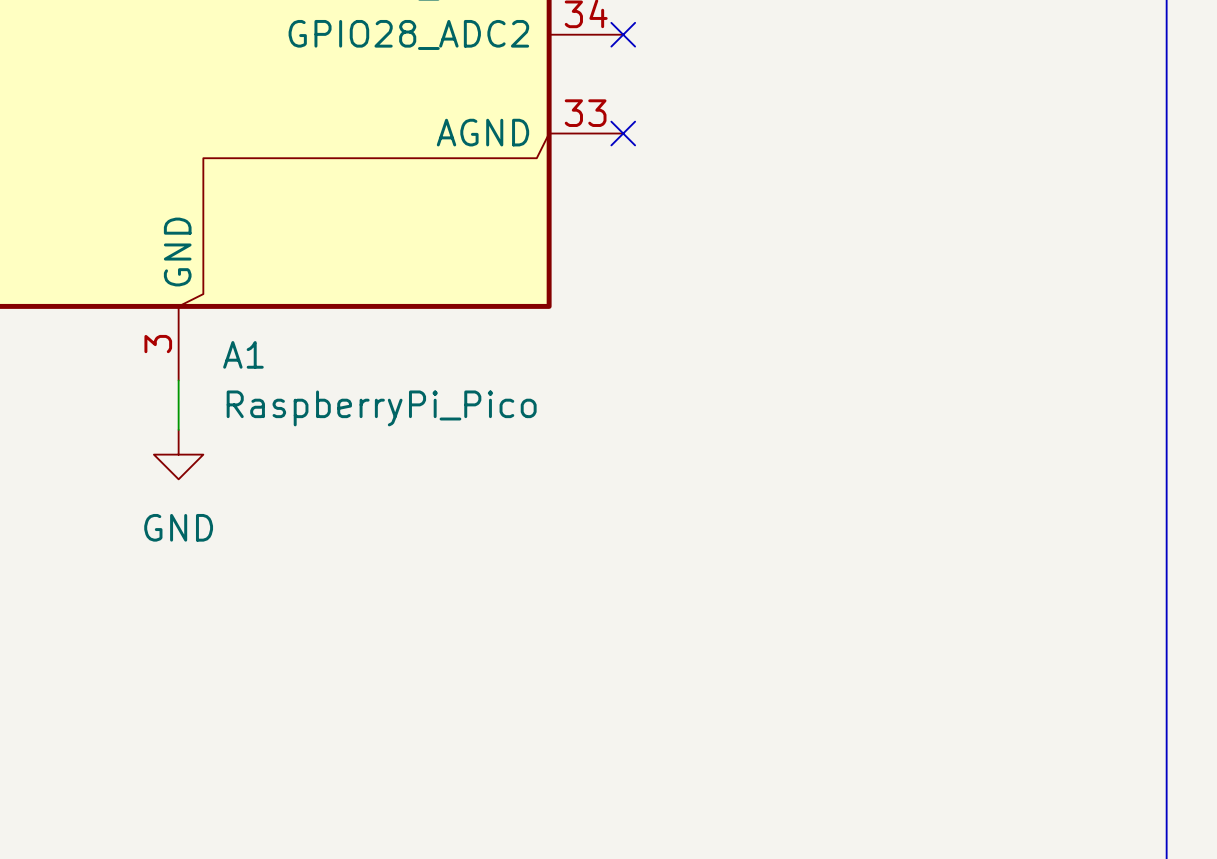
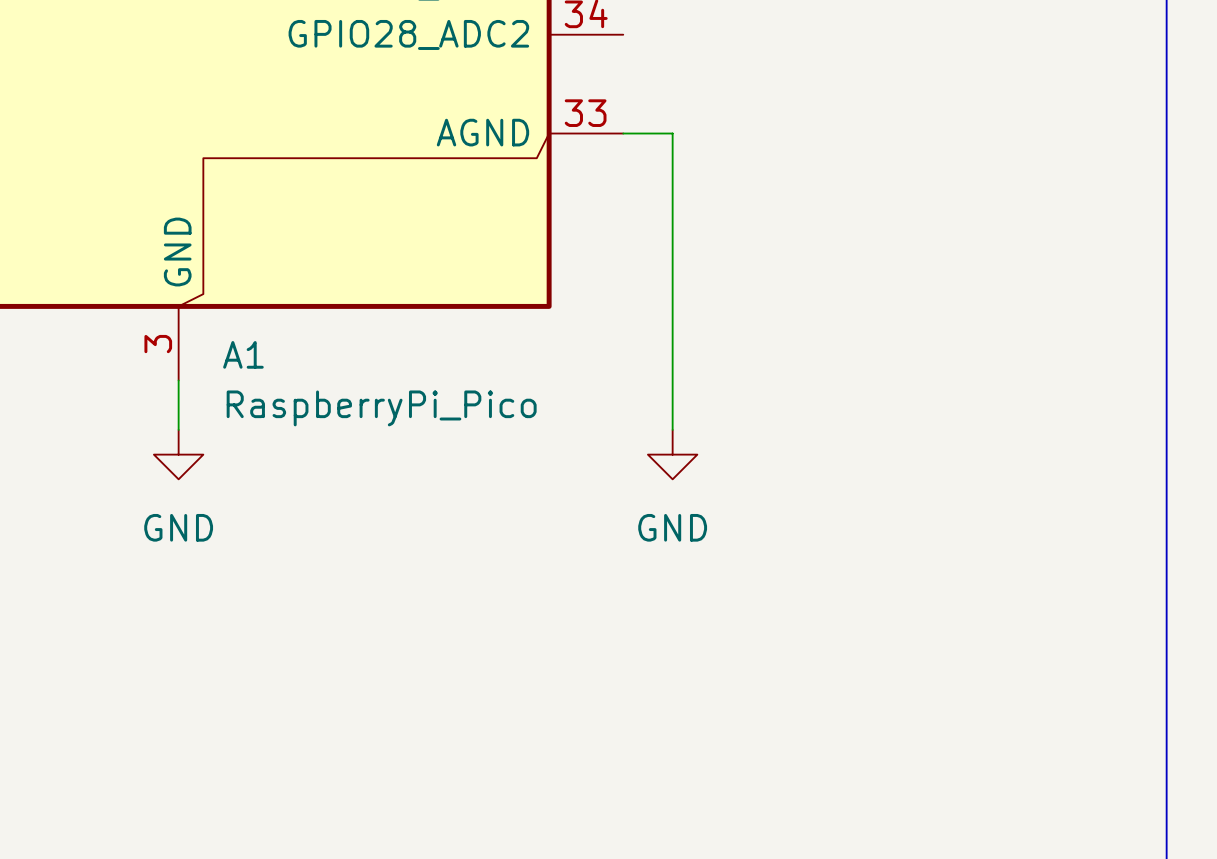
no-connect mark: (623, 34) -> none
wire: none -> (623, 133) (672, 133) (672, 429)
no-connect mark: (623, 133) -> none
power symbol: none -> GND (672, 454)

